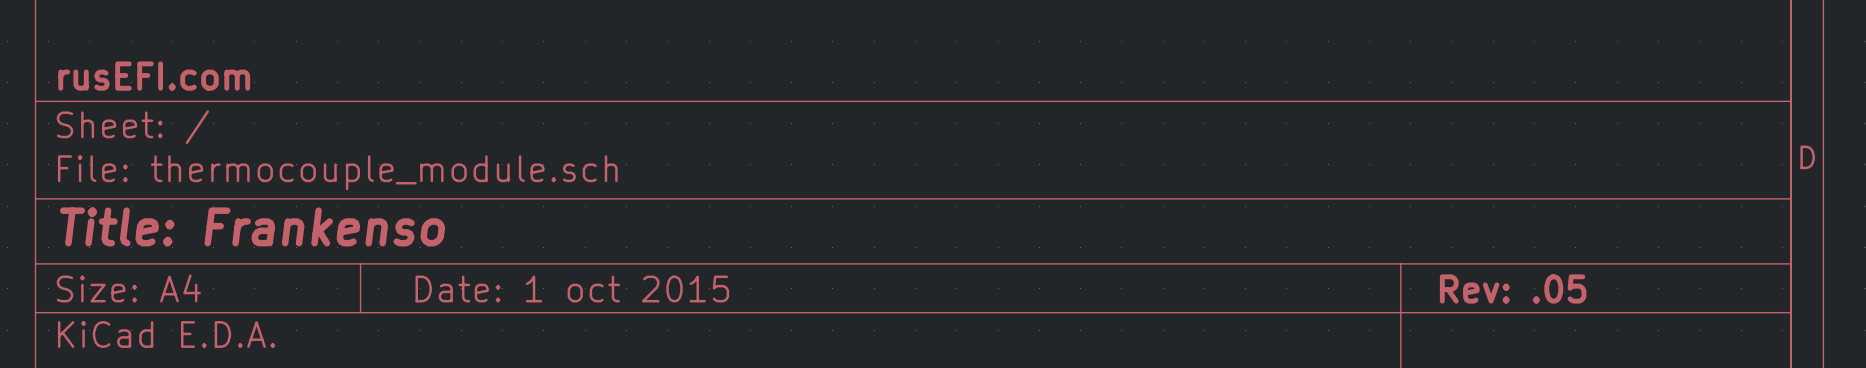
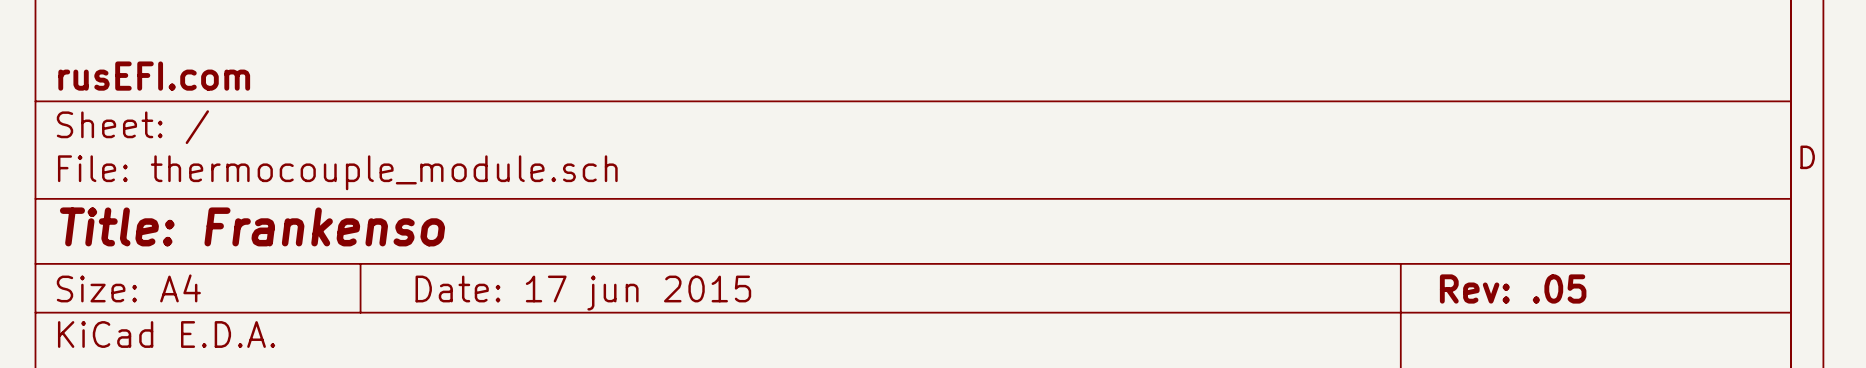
title block: Date: 1 oct 2015 (572, 288) -> Date: 17 jun 2015 (583, 293)

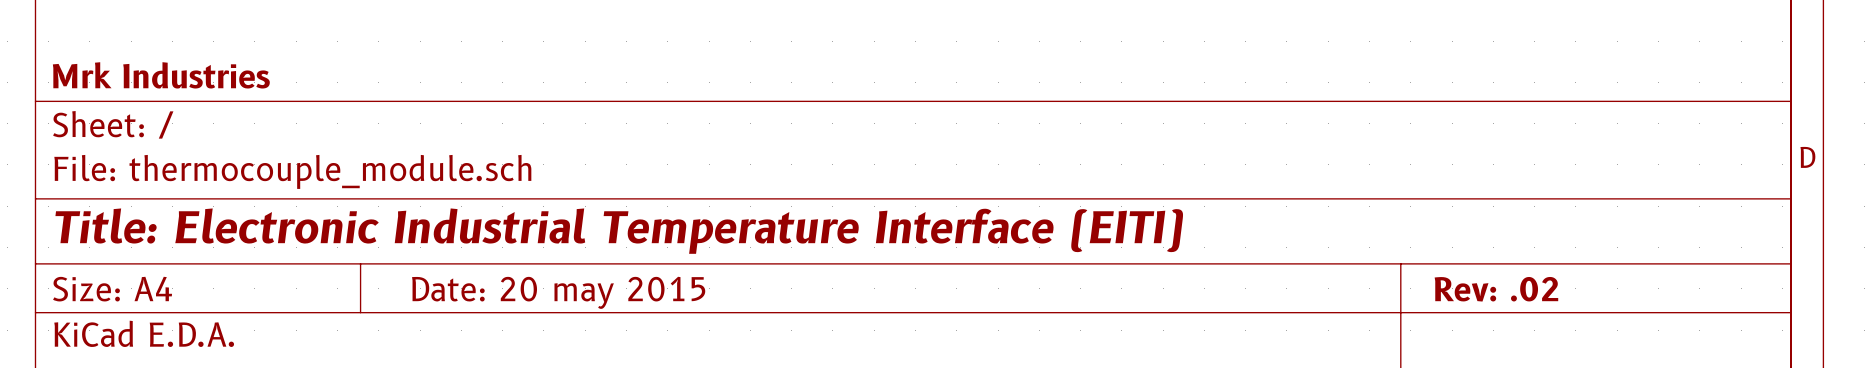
title block: rusEFI.com (154, 76) -> Mrk Industries (161, 75)
title block: Title: Frankenso (252, 226) -> Title: Electronic Industrial Temperature Interface (EITI) (619, 231)
title block: Rev: .05 (1513, 288) -> Rev: .02 (1496, 289)
title block: Date: 17 jun 2015 (583, 293) -> Date: 20 may 2015 (558, 292)

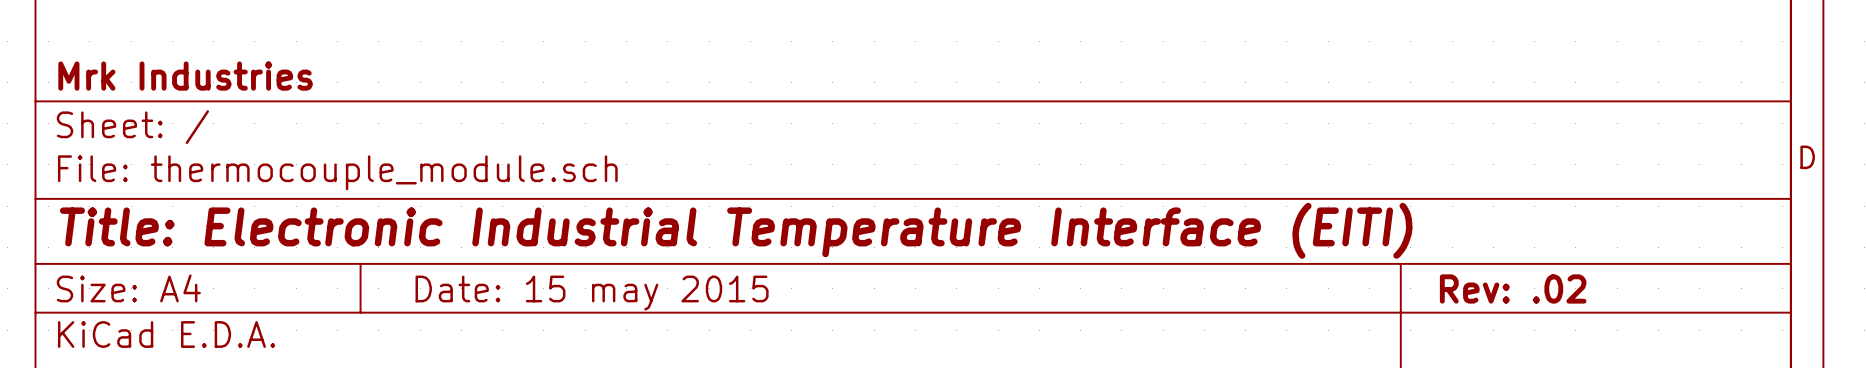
title block: Date: 20 may 2015 (558, 292) -> Date: 15 may 2015 (592, 293)

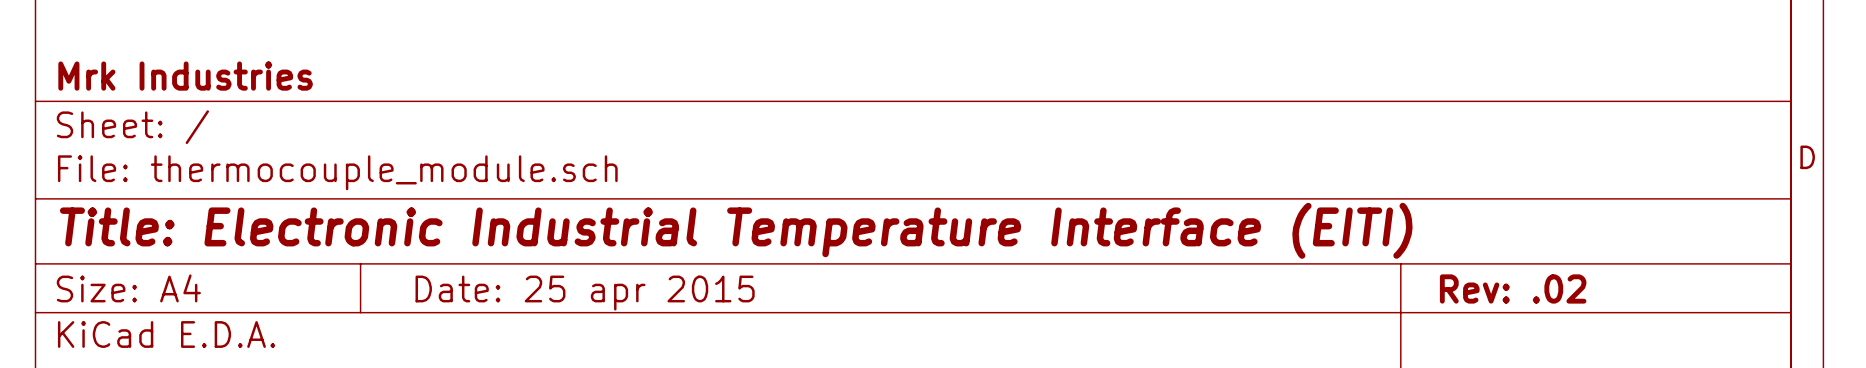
title block: Date: 15 may 2015 (592, 293) -> Date: 25 apr 2015 (585, 293)

